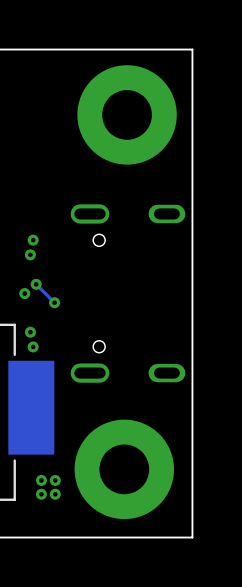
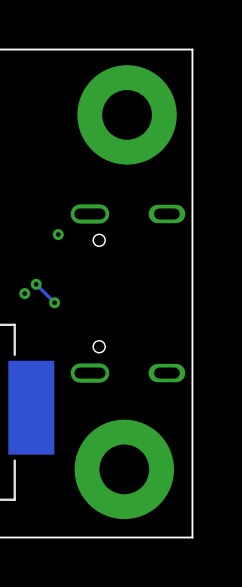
via: none -> (58, 234)
via: (33, 240) -> none
via: (30, 254) -> none
via: (30, 332) -> none
via: (33, 346) -> none
via: (41, 480) -> none
via: (55, 480) -> none
via: (41, 494) -> none
via: (55, 494) -> none

